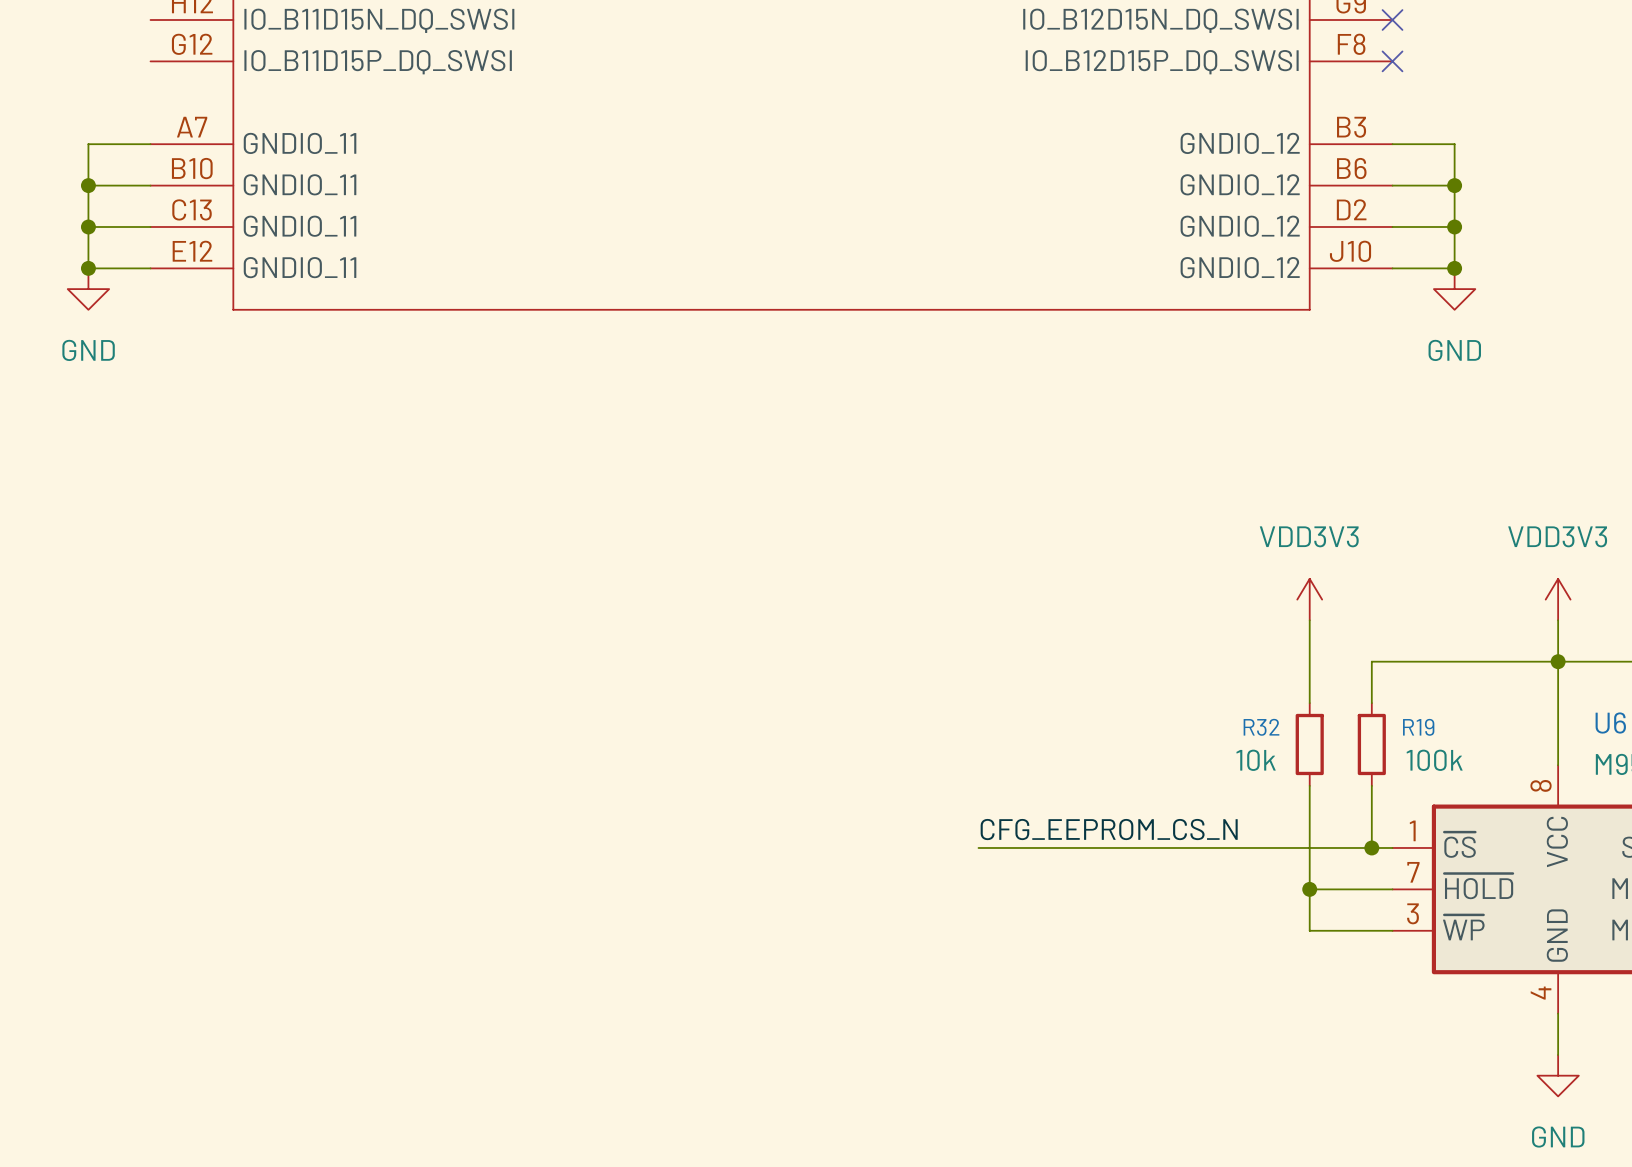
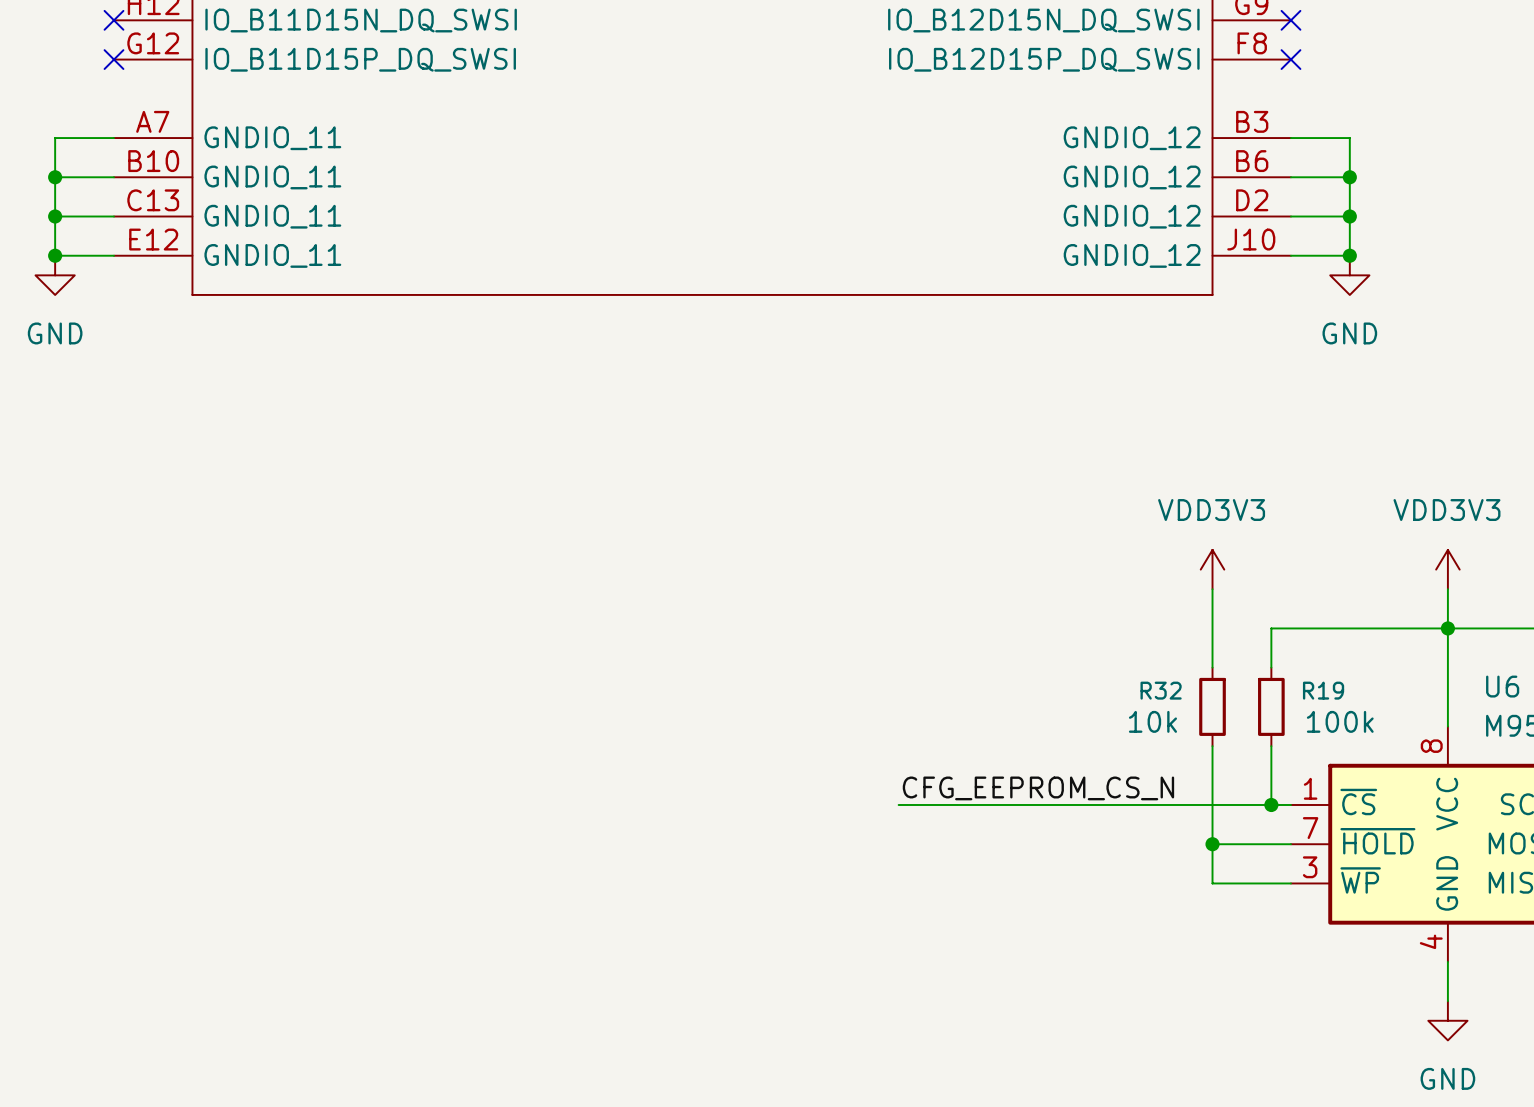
no-connect mark: none -> (113, 20)
no-connect mark: none -> (113, 59)

